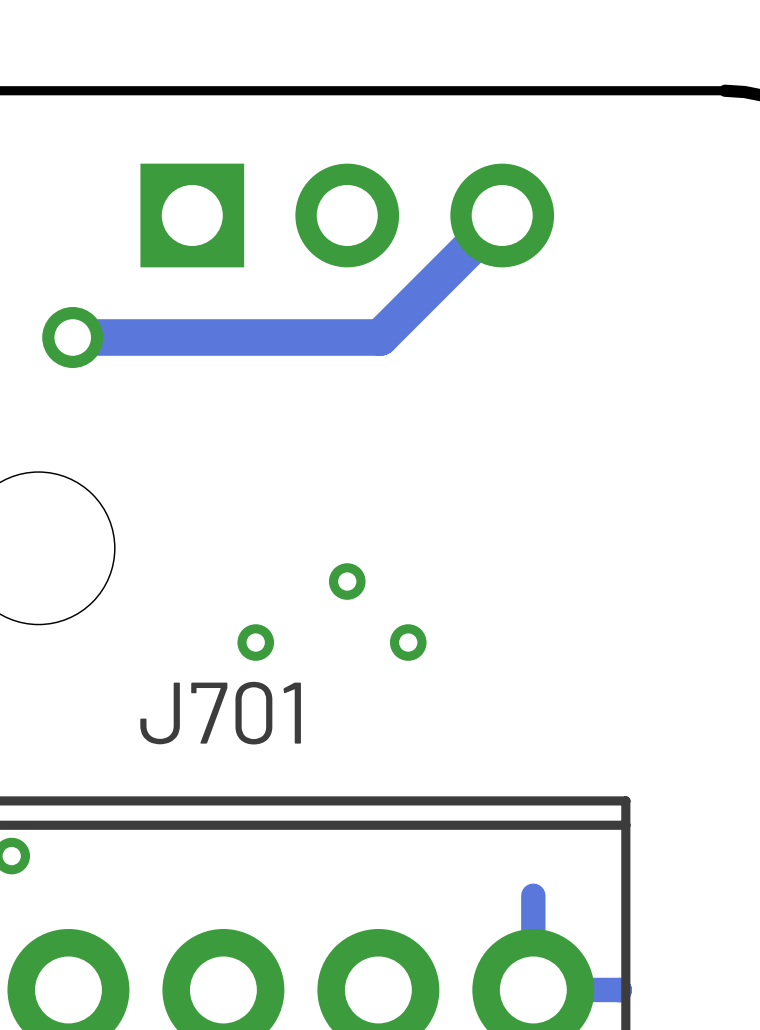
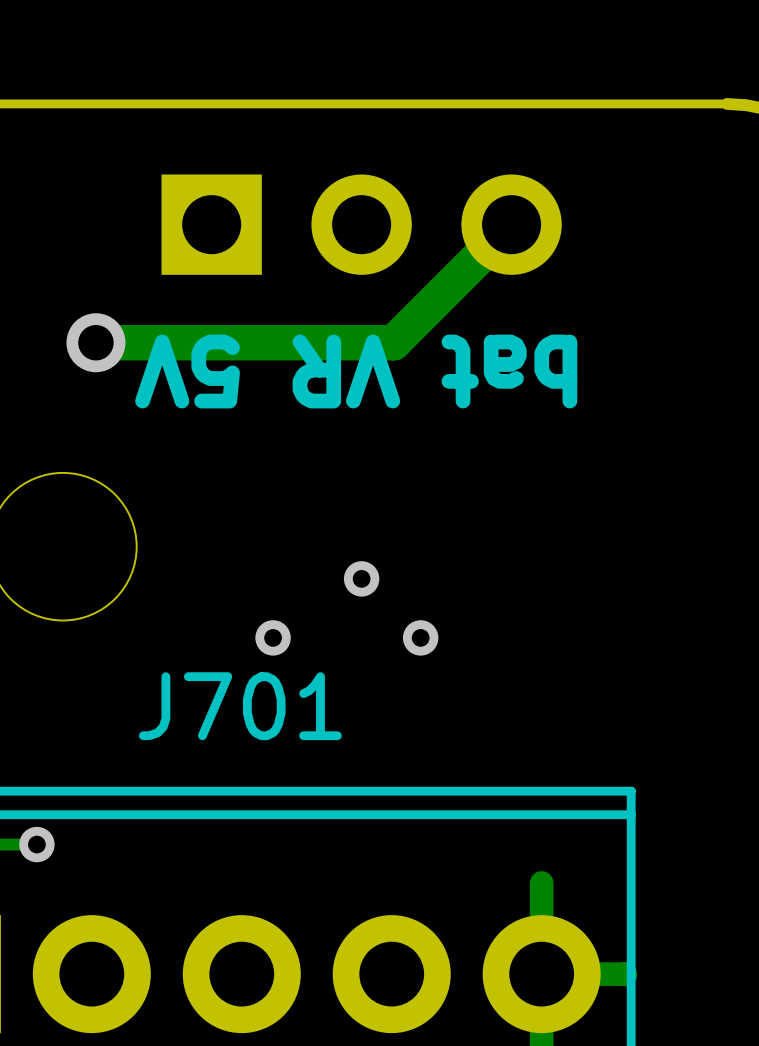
text: none -> bat VR 5V (356, 371)

